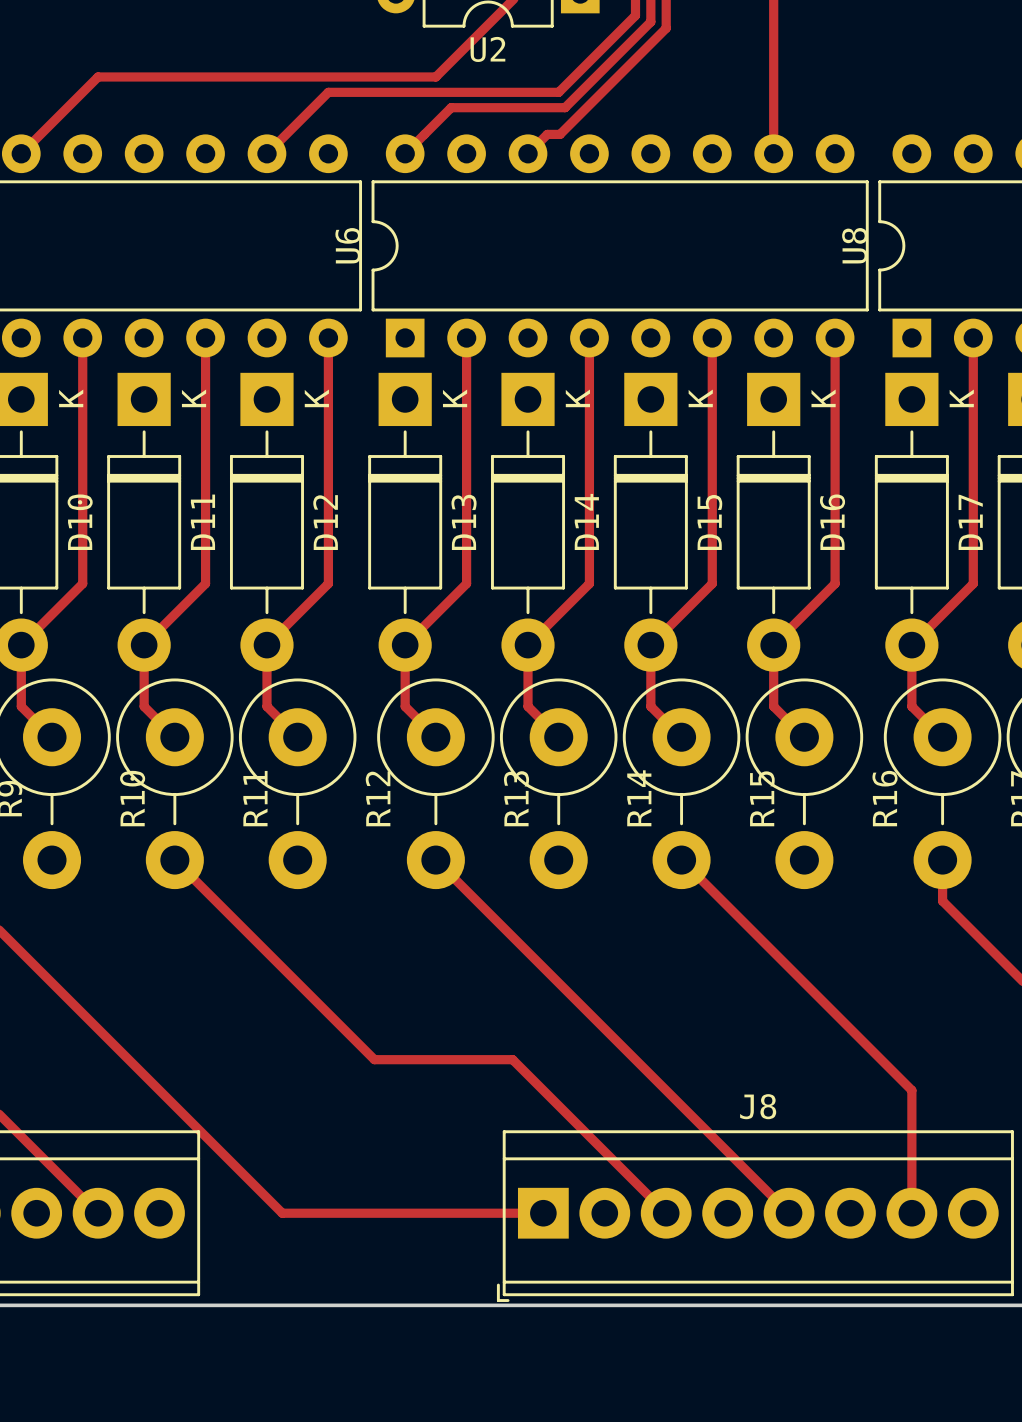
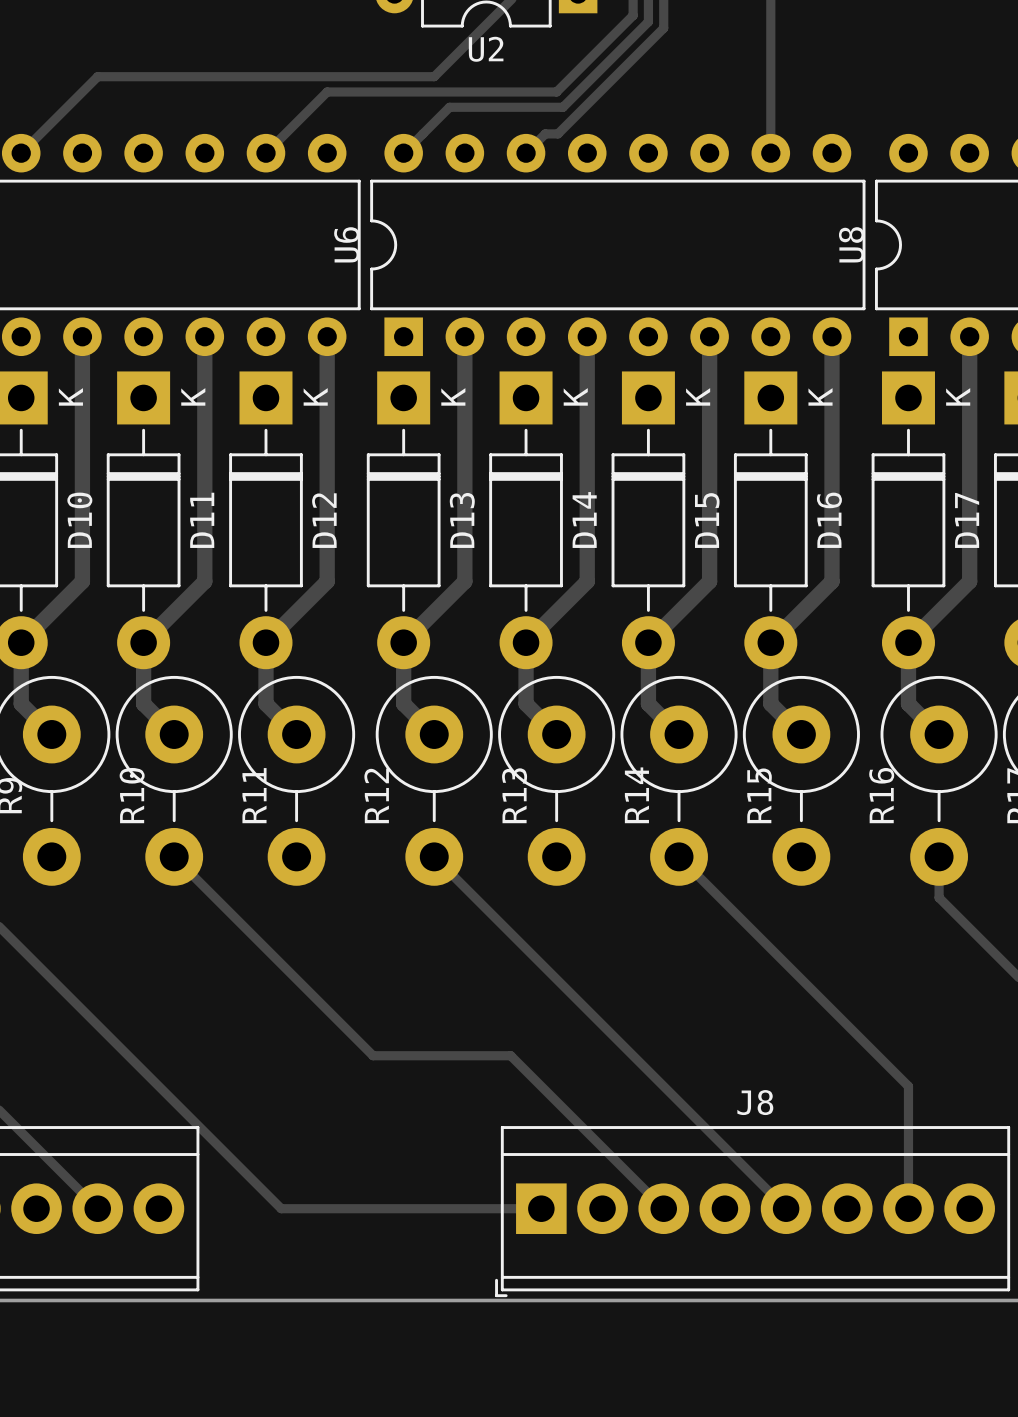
track width: thin (82, 338) (82, 583) (21, 645) (21, 706) (52, 737) -> thick (82, 336) (82, 581) (21, 642) (21, 703) (51, 734)
track width: thin (205, 338) (205, 583) (144, 645) (144, 706) (174, 737) -> thick (204, 336) (204, 581) (143, 642) (143, 703) (174, 734)
track width: thin (328, 338) (328, 583) (266, 645) (266, 706) (297, 737) -> thick (327, 336) (327, 581) (265, 642) (265, 703) (296, 734)
track width: thin (466, 338) (466, 583) (405, 645) (405, 706) (435, 737) -> thick (464, 336) (464, 581) (403, 642) (403, 703) (434, 734)
track width: thin (589, 338) (589, 583) (528, 645) (528, 706) (558, 737) -> thick (587, 336) (587, 581) (526, 642) (526, 703) (556, 734)
track width: thin (712, 338) (712, 583) (650, 645) (650, 706) (681, 737) -> thick (709, 336) (709, 581) (648, 642) (648, 703) (679, 734)
track width: thin (835, 338) (835, 583) (773, 645) (773, 706) (804, 737) -> thick (832, 336) (832, 581) (770, 642) (770, 703) (801, 734)
track width: thin (973, 338) (973, 583) (911, 645) (911, 706) (942, 737) -> thick (969, 336) (969, 581) (908, 642) (908, 703) (939, 734)

